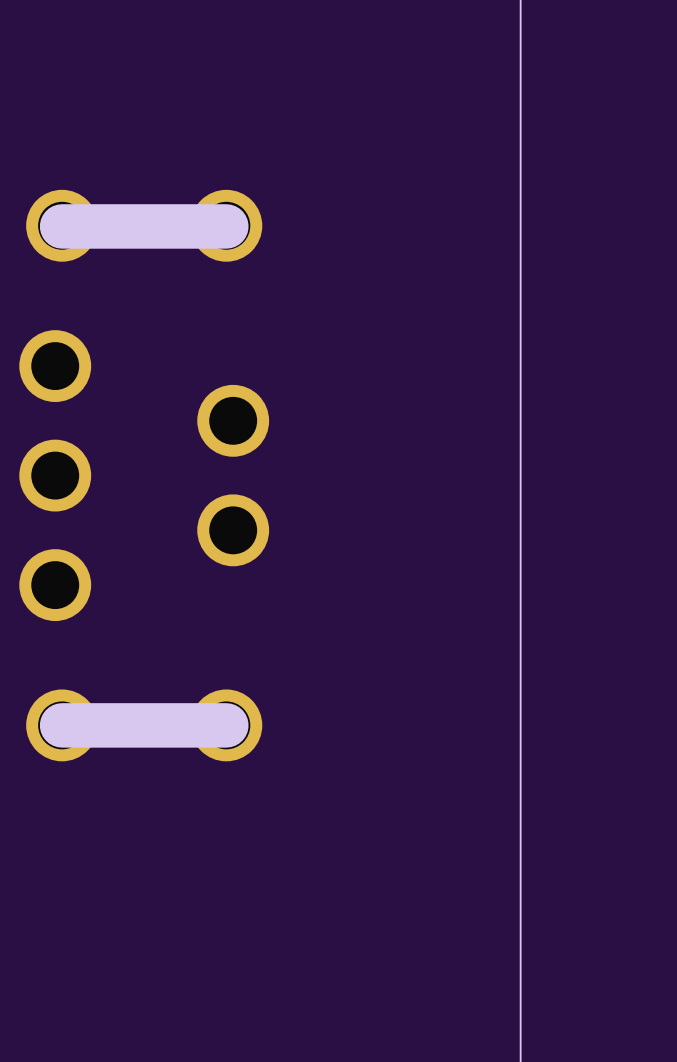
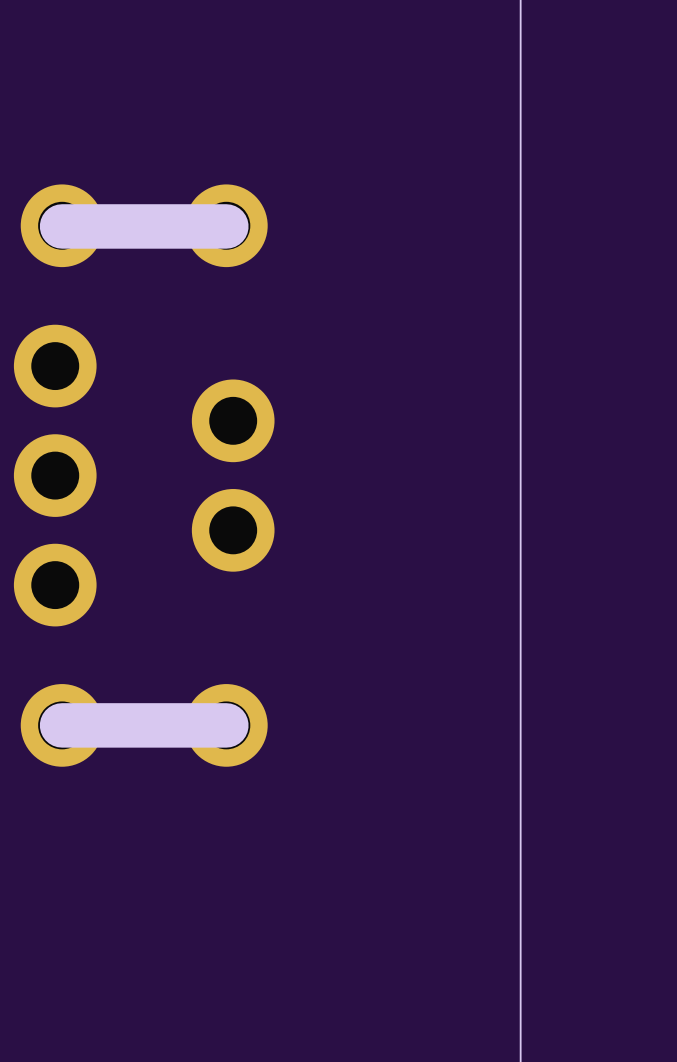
part footprint: [19, 189, 270, 762] -> [13, 184, 275, 767]

